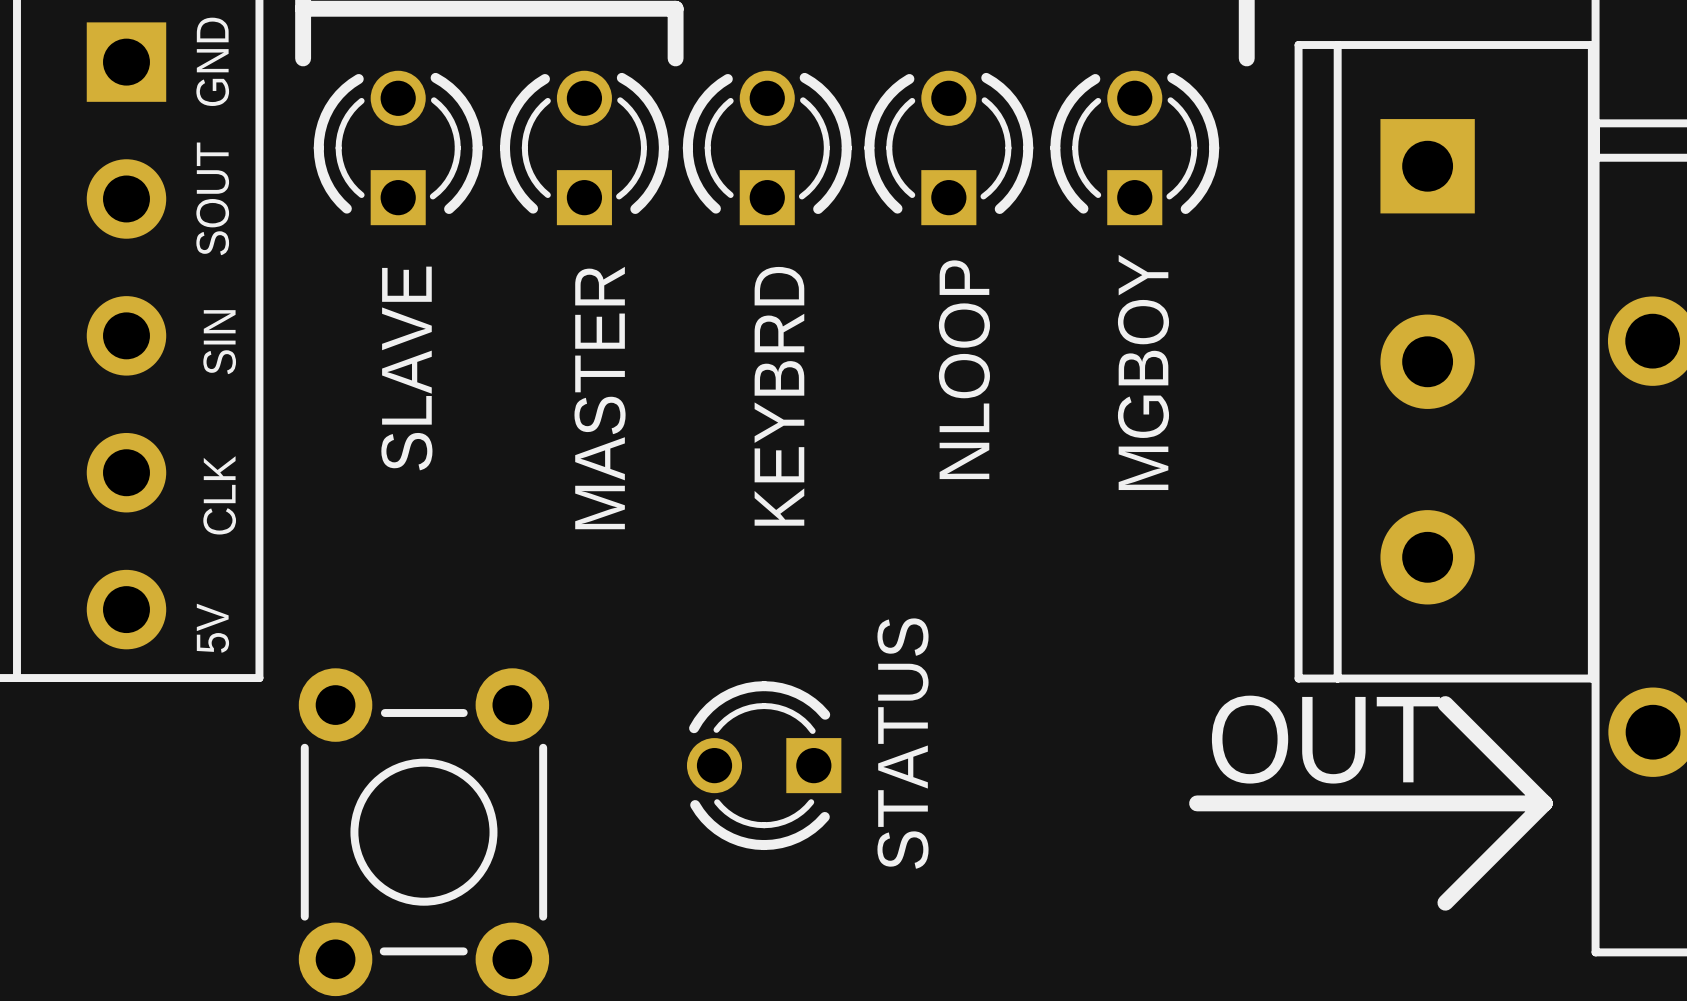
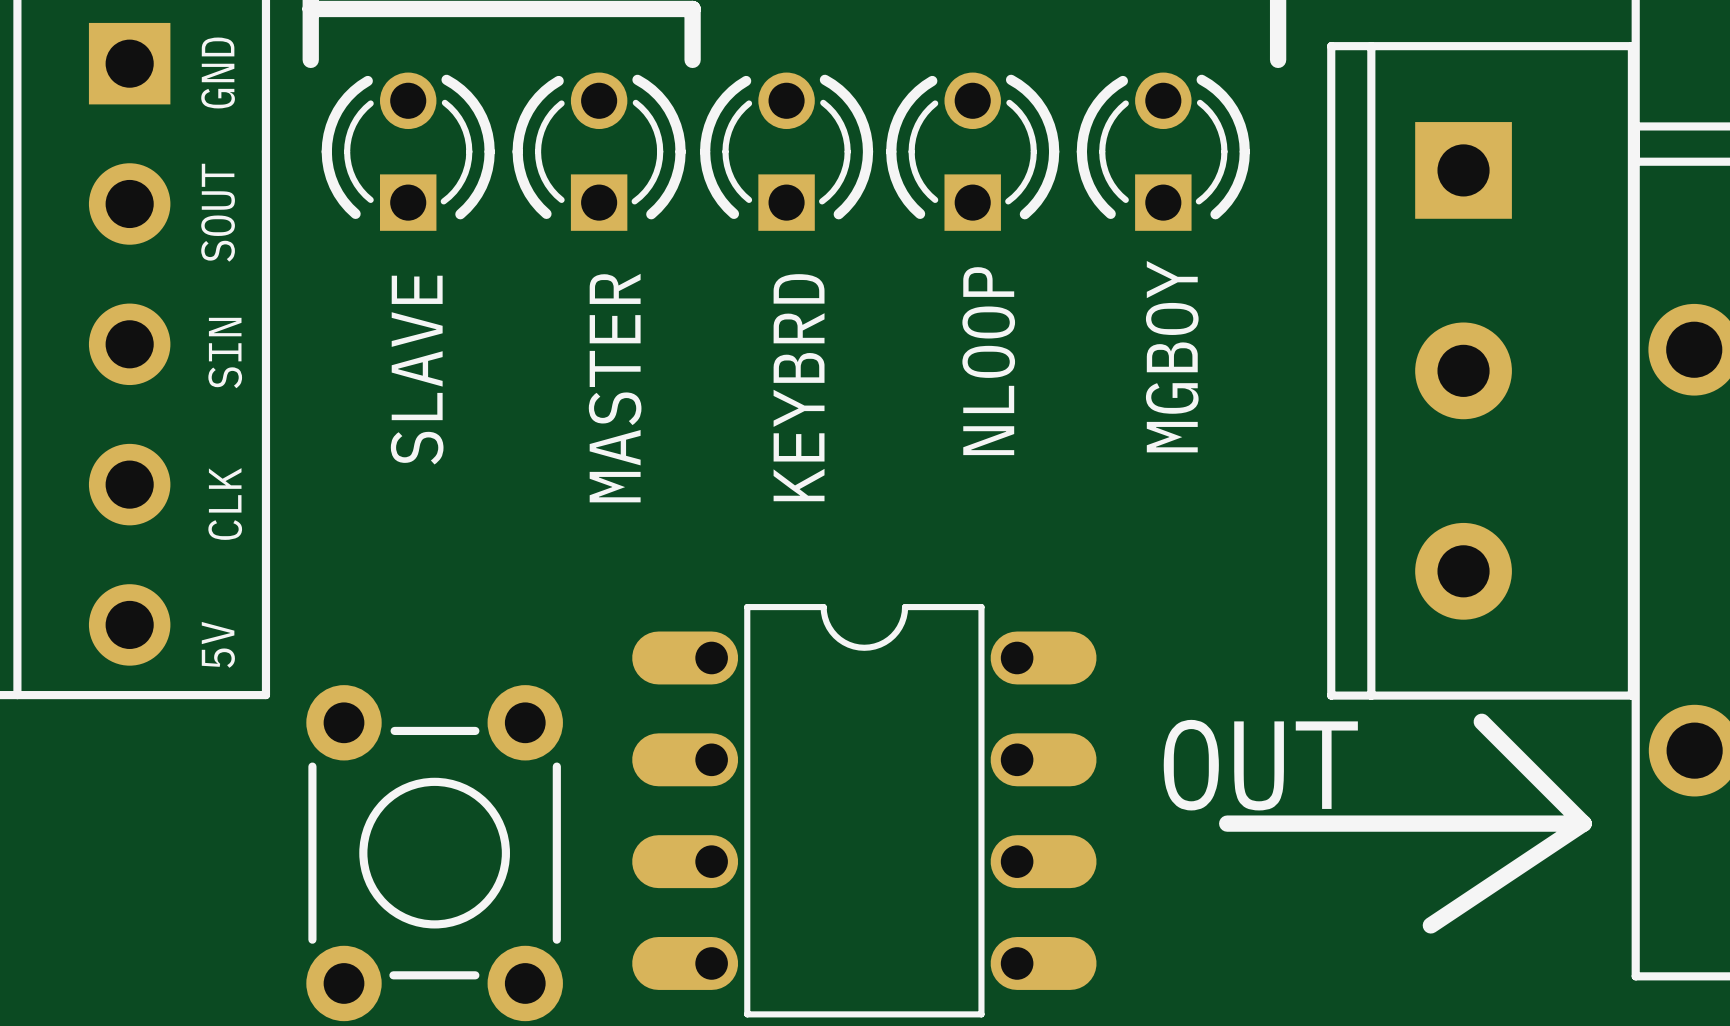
text position: OUT (1325, 739) -> OUT (1260, 765)
STATUS: (764, 765) -> none
part: none -> (864, 810)
line: (1544, 803) (1445, 902) -> (1583, 823) (1430, 925)

